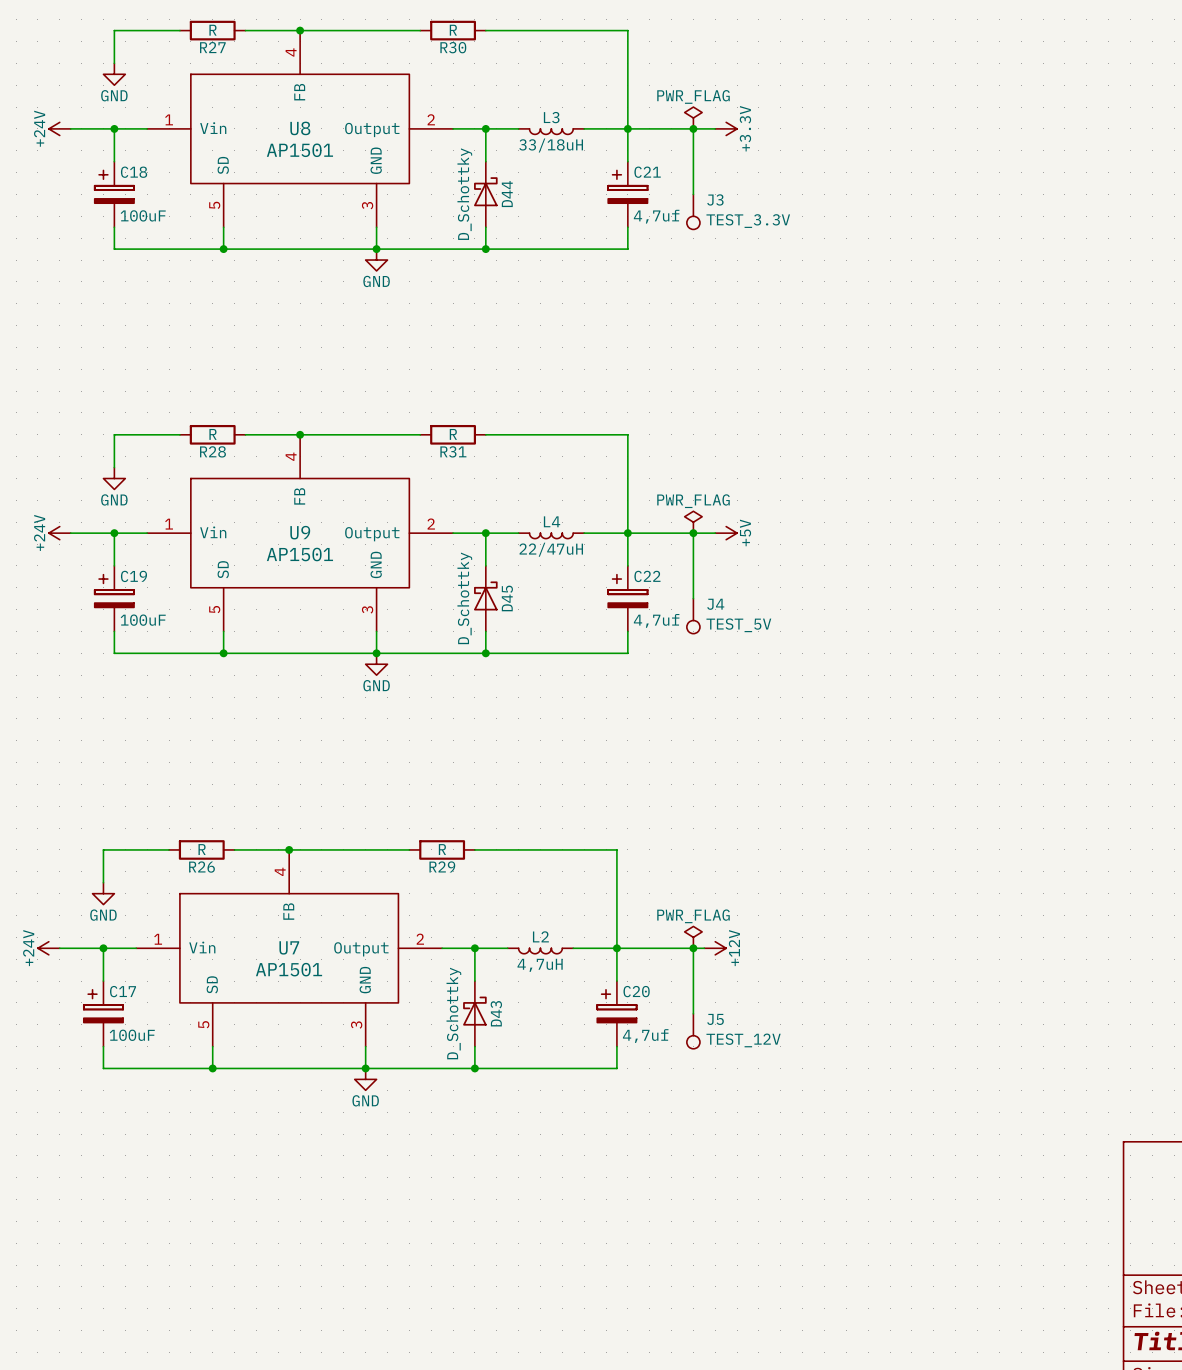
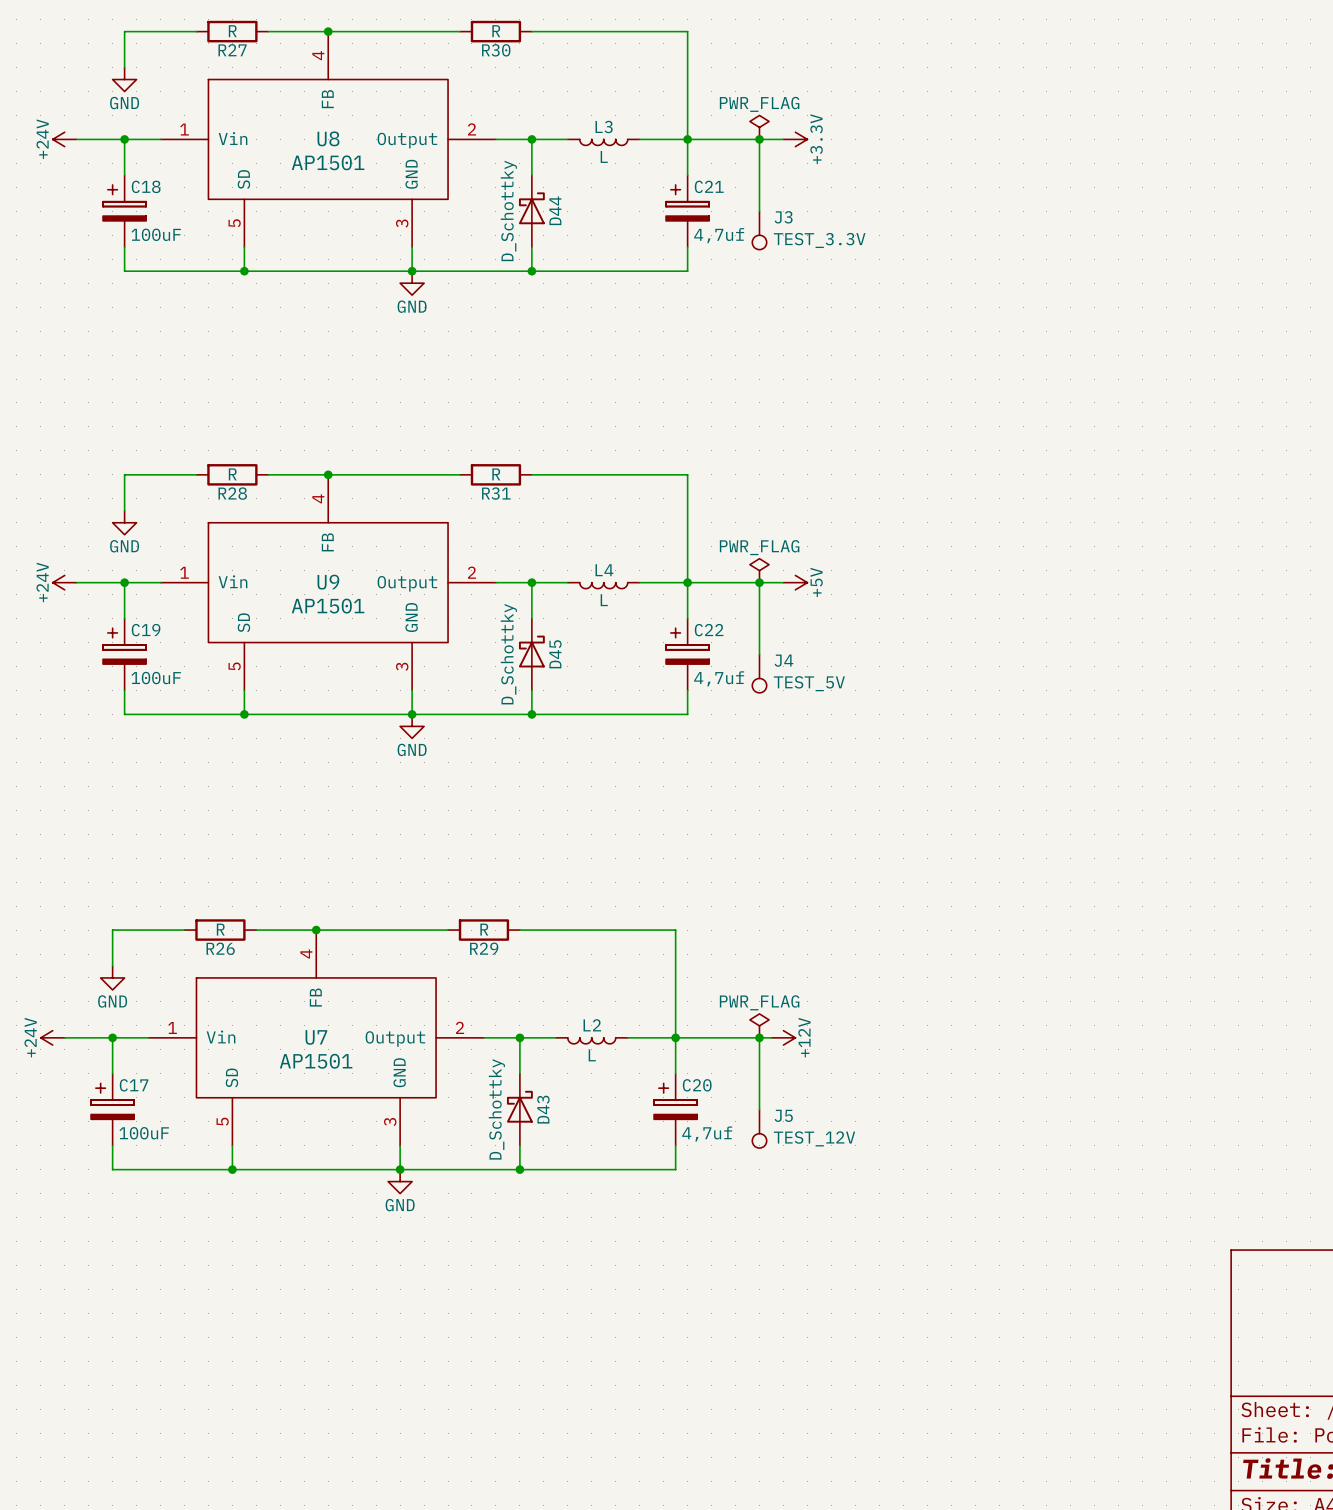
L3 value: 33/18uH (551, 145) -> L (604, 156)
L4 value: 22/47uH (551, 549) -> L (604, 600)
L2 value: 4,7uH (540, 965) -> L (592, 1055)

